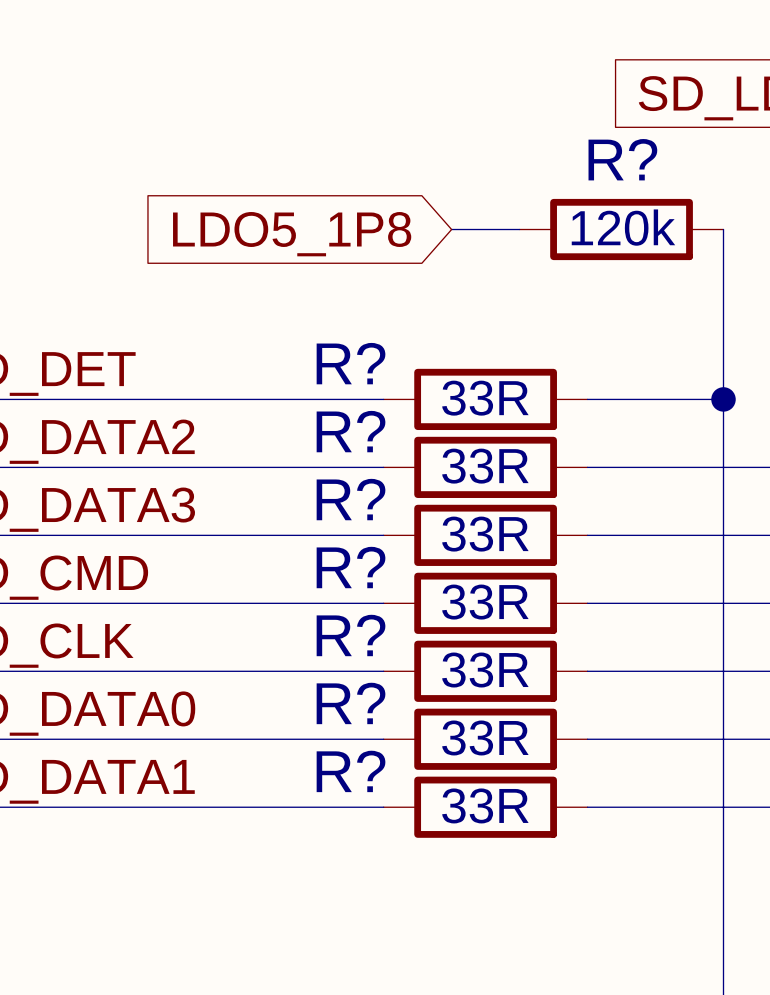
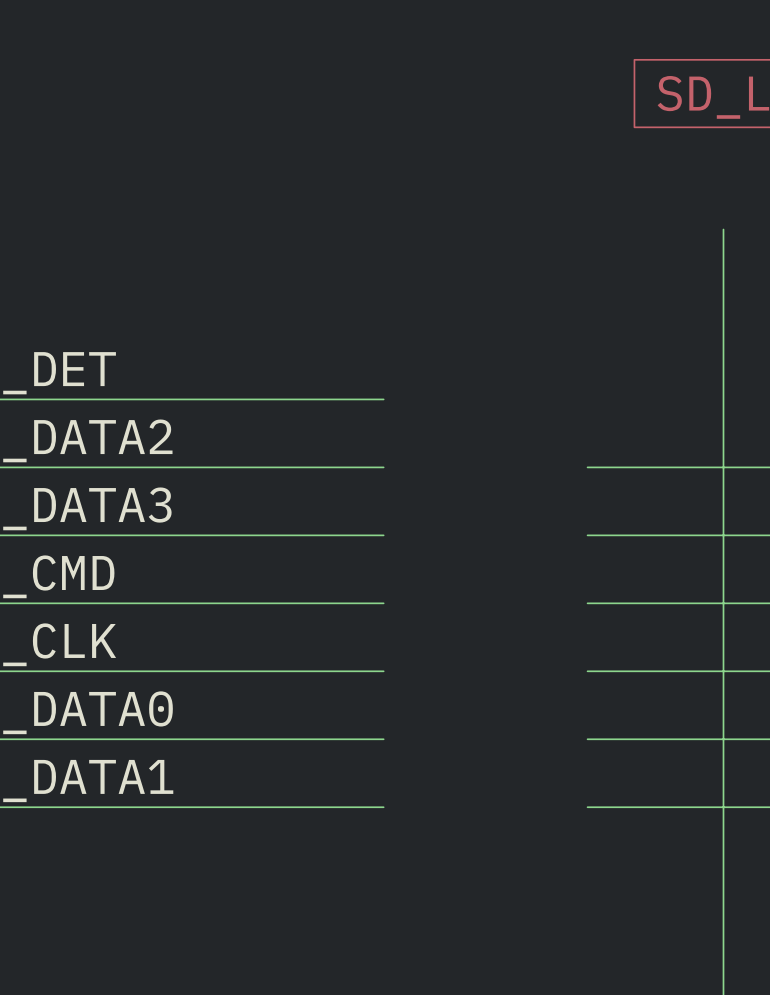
wire: (451, 229) (519, 229) -> none
R?: (621, 229) -> none
global label: LDO5_1P8 (292, 234) -> none
R?: (485, 399) -> none
wire: (587, 399) (723, 399) -> none
junction: (723, 399) -> none
R?: (485, 467) -> none
R?: (485, 535) -> none
R?: (485, 603) -> none
R?: (485, 671) -> none
R?: (485, 739) -> none
R?: (485, 807) -> none

